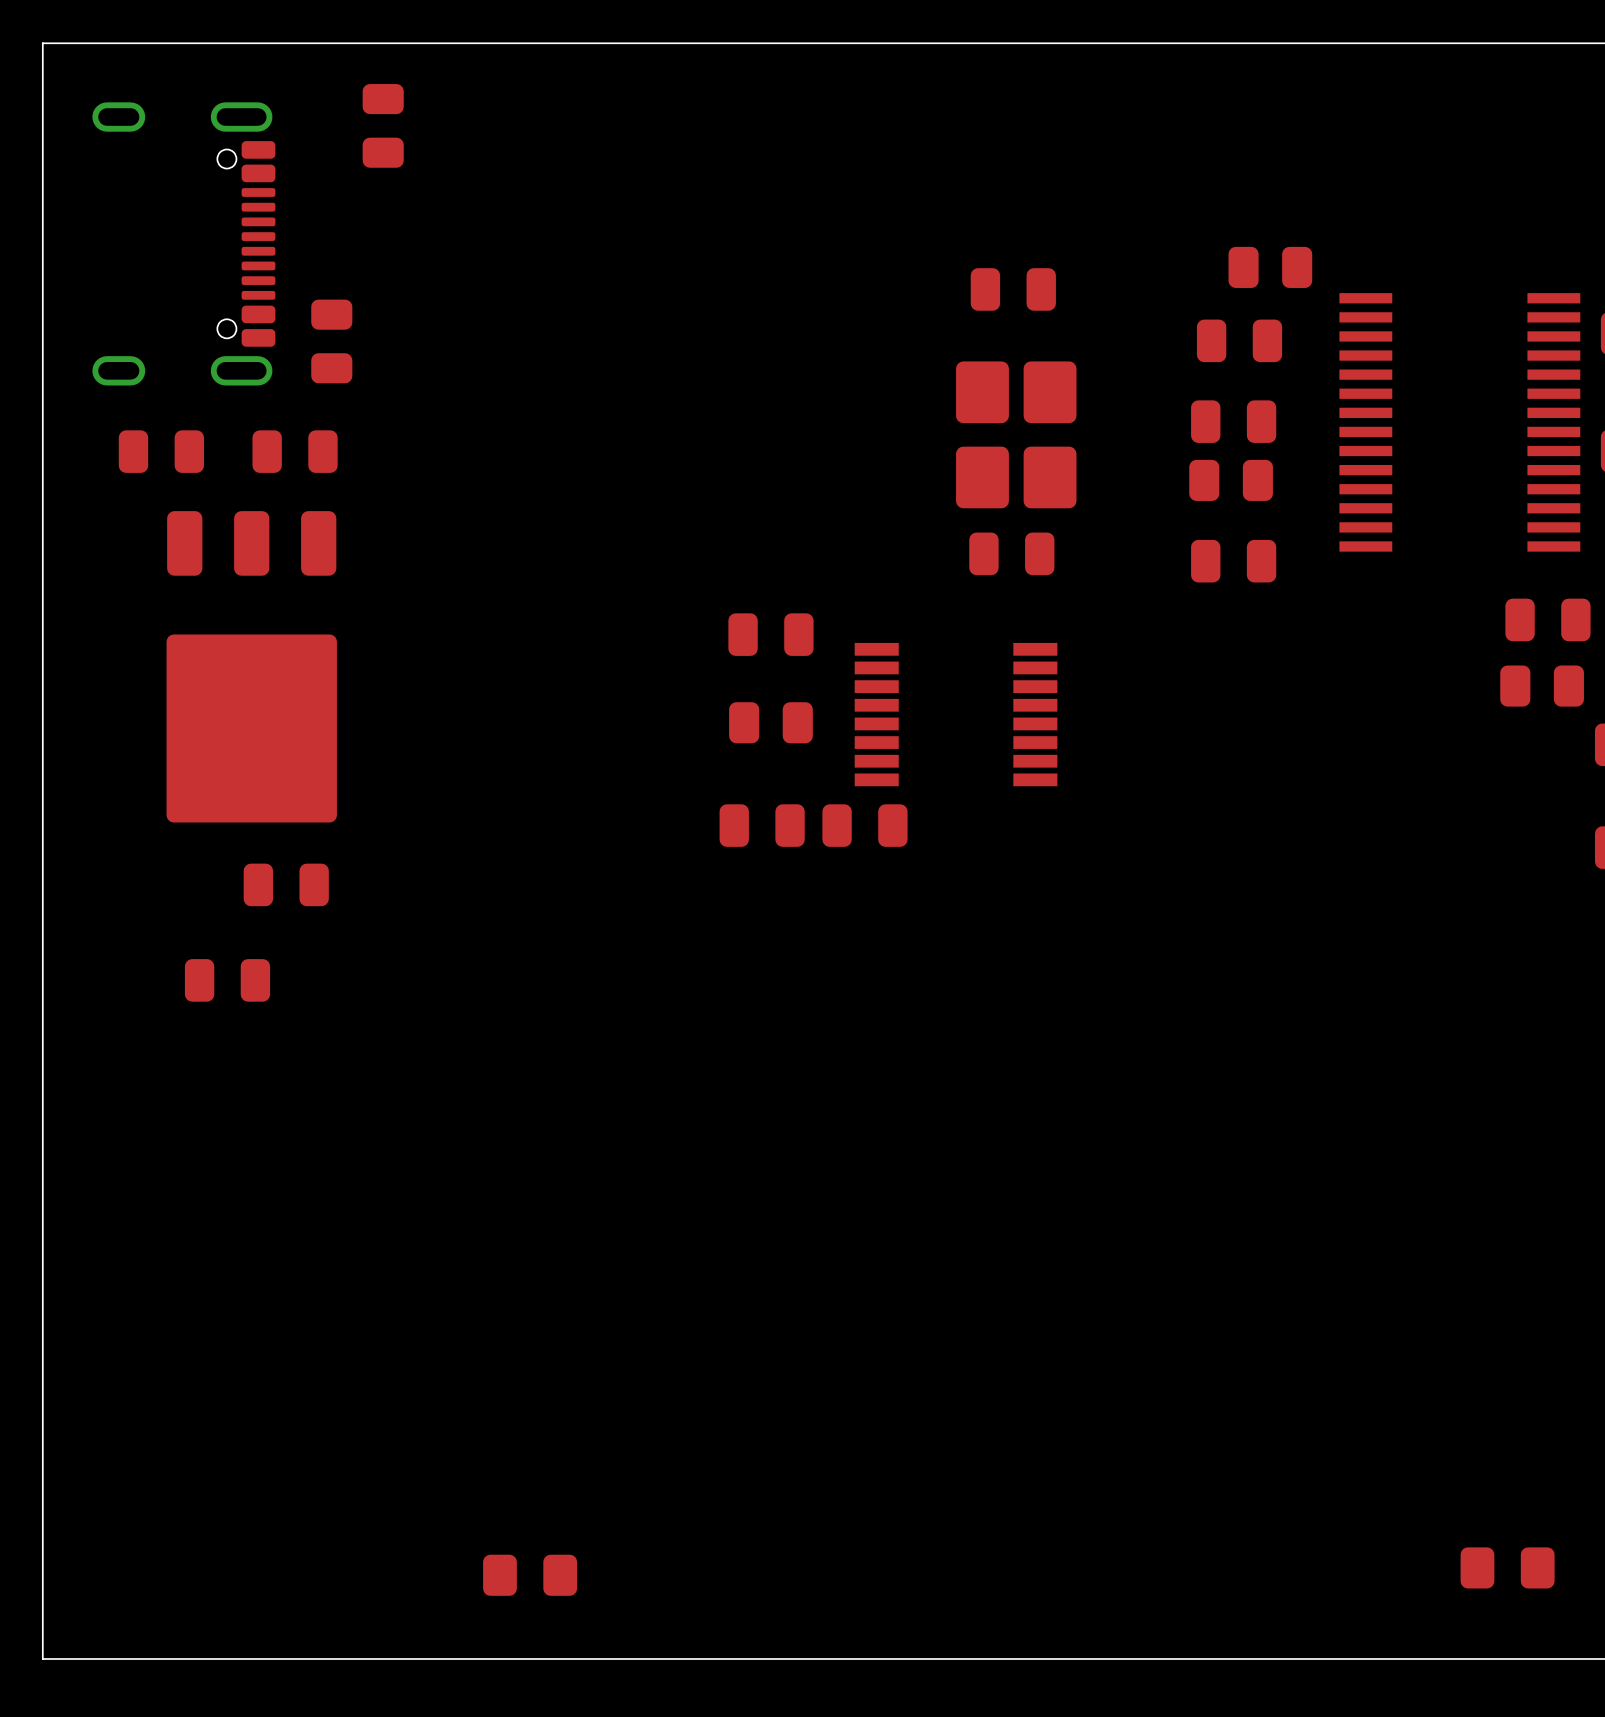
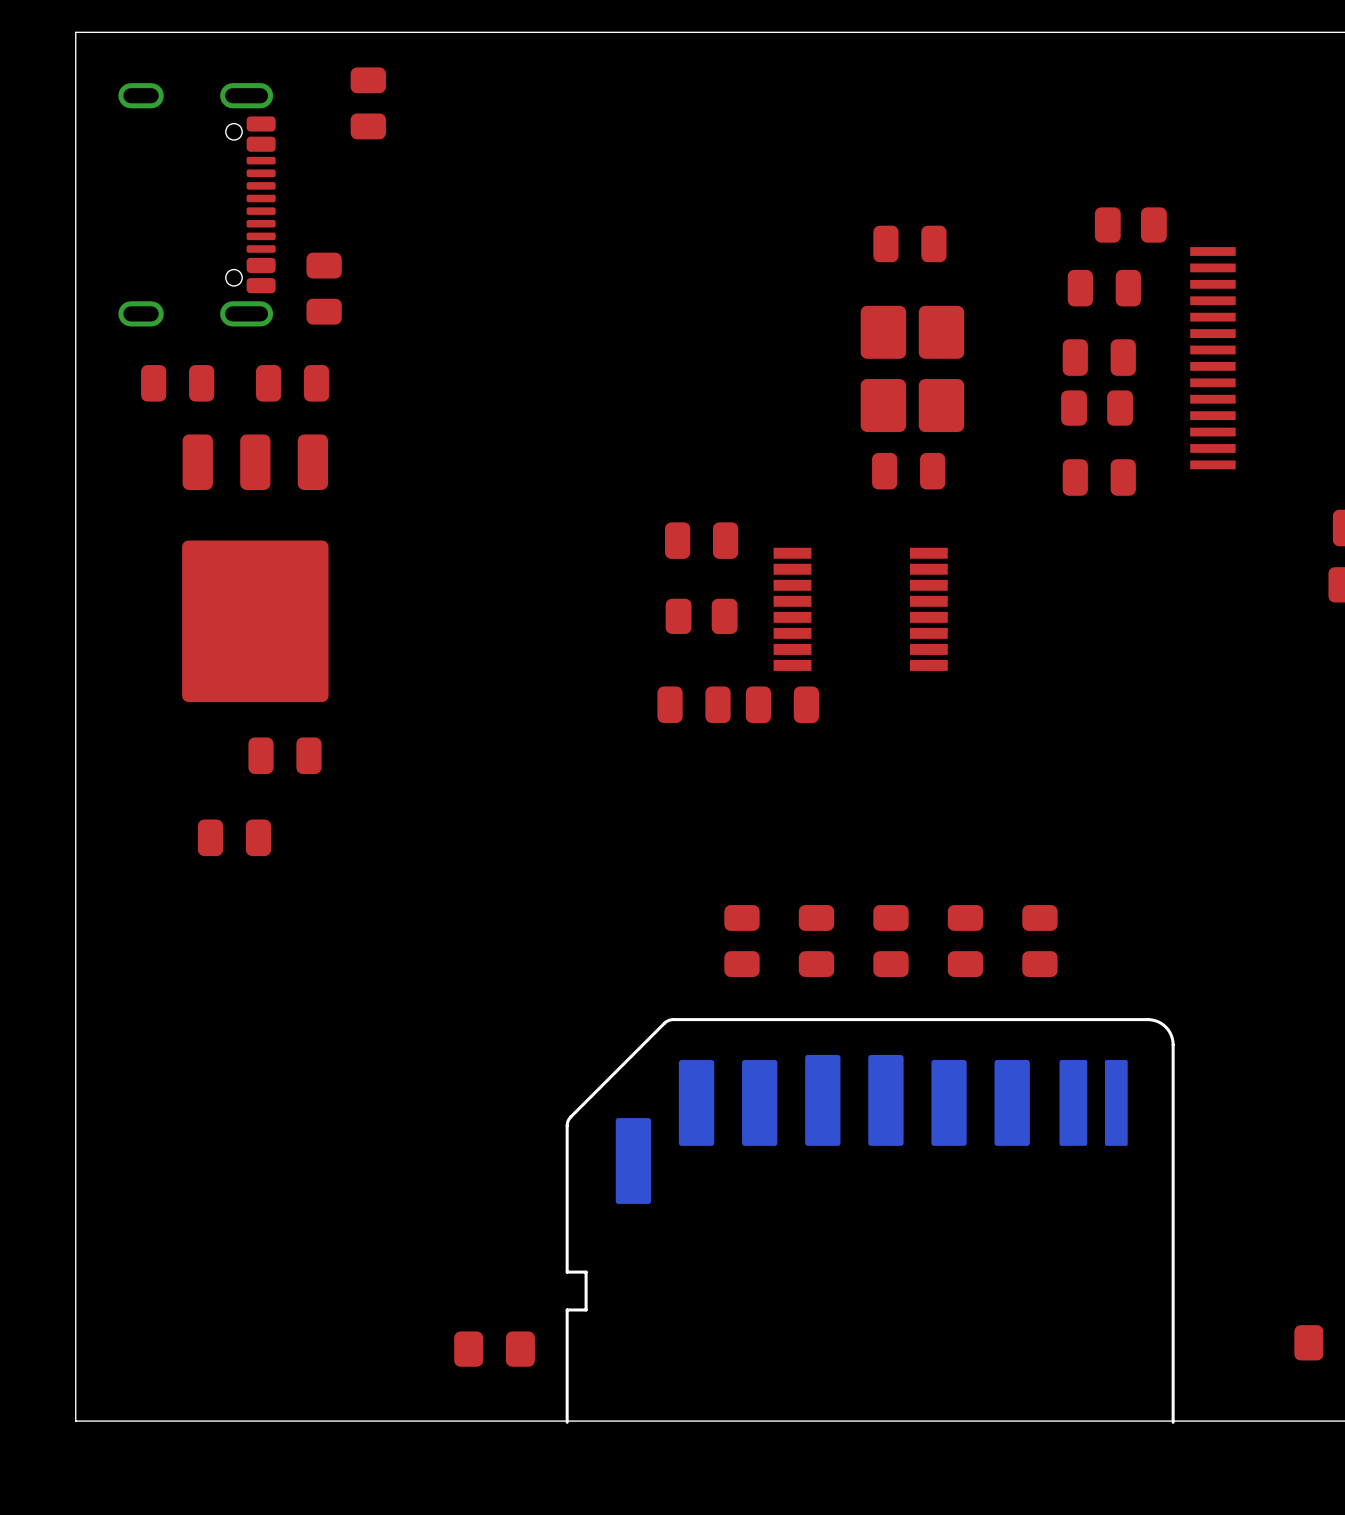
part: none -> (742, 941)
part: none -> (816, 941)
part: none -> (890, 941)
part: none -> (965, 941)
part: none -> (1039, 941)
part: none -> (870, 1220)

